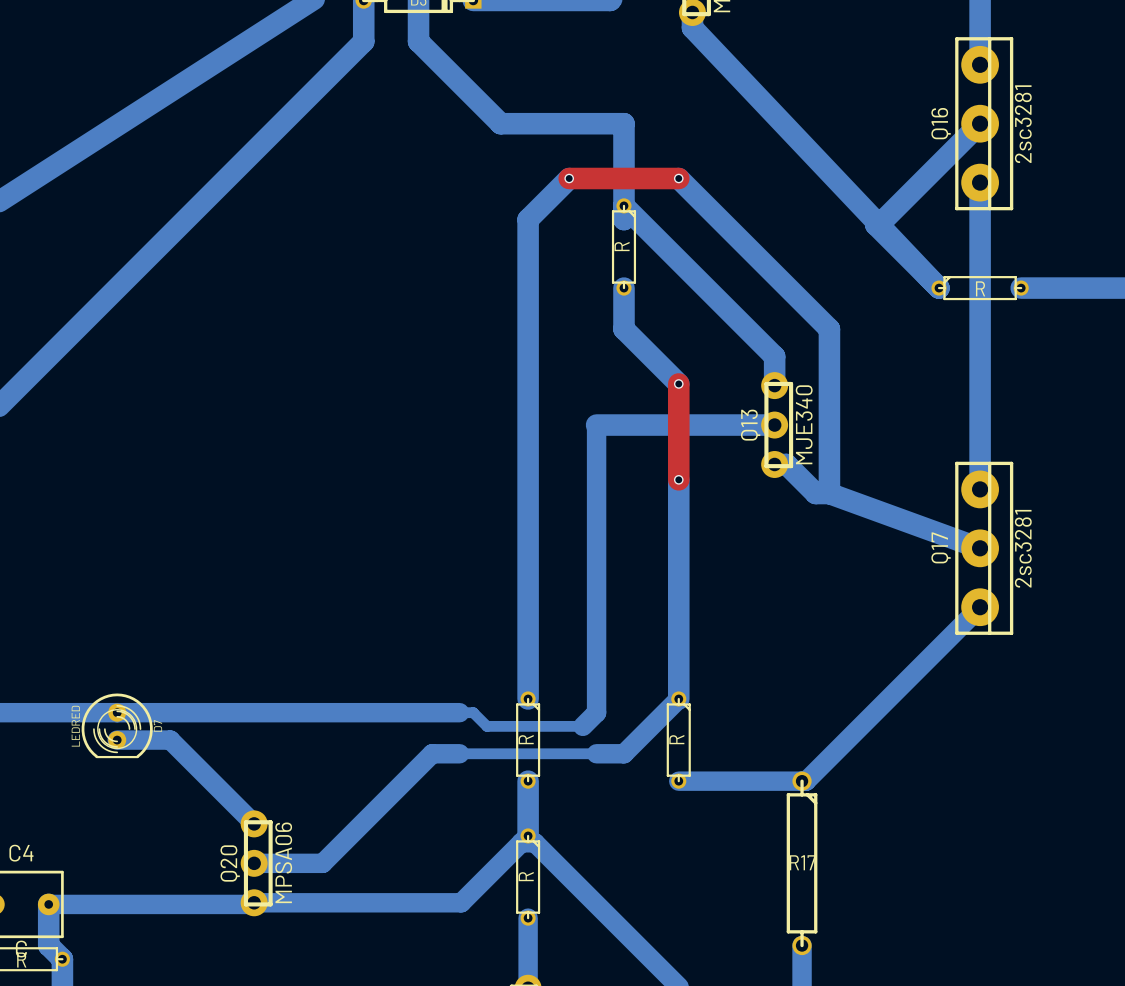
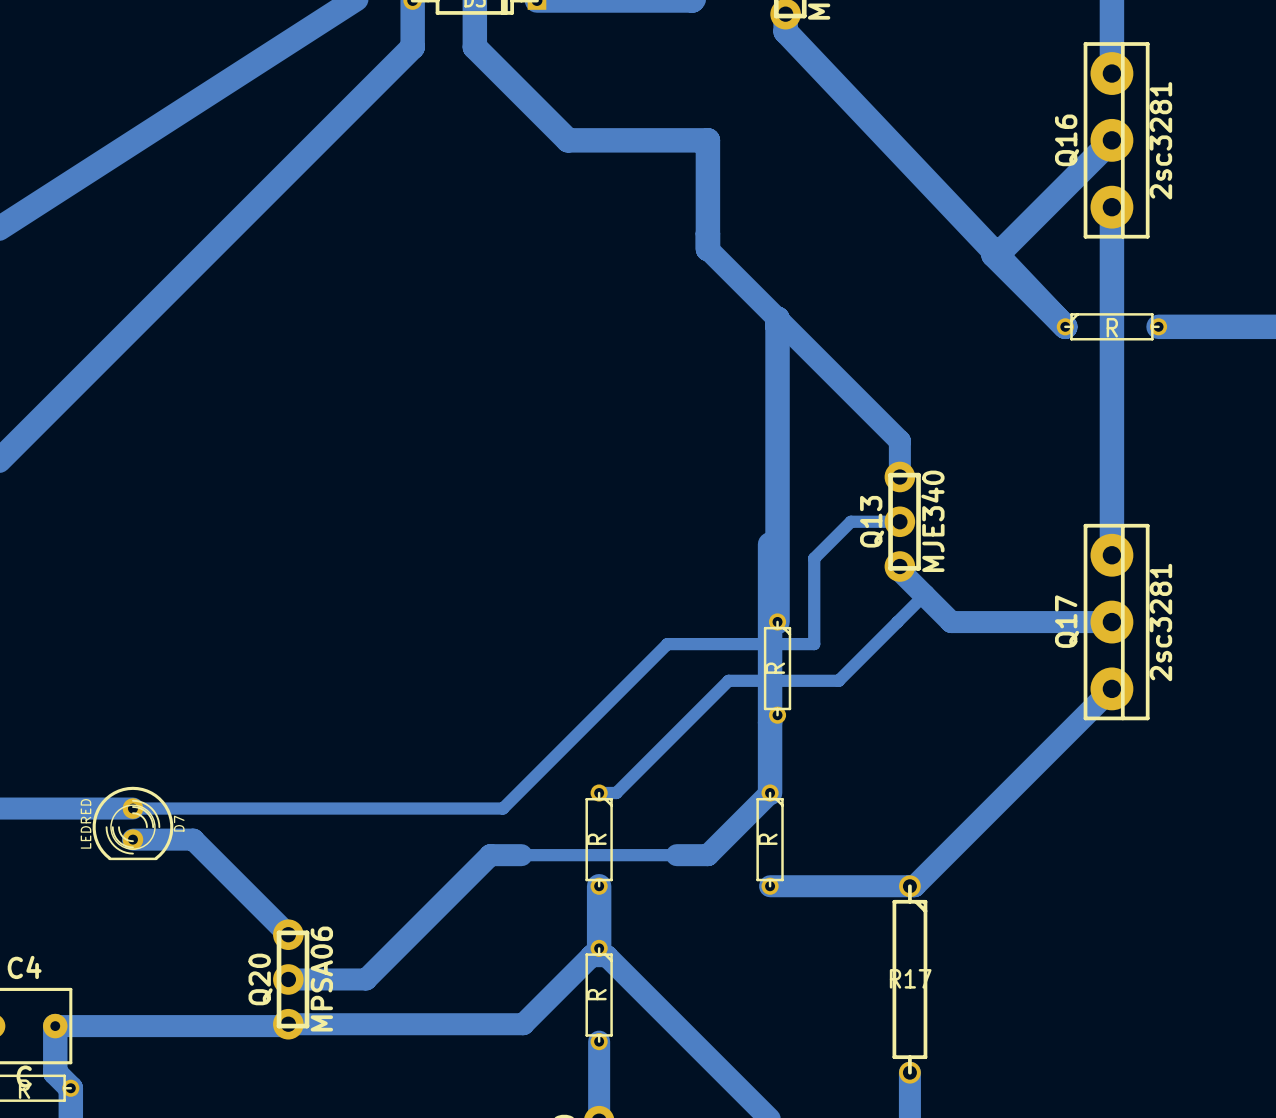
bottom track: (569, 178) (528, 219) (528, 698) -> (924, 595) (838, 680) (728, 680) (616, 793) (599, 793)
top track: (569, 178) (678, 178) -> none
via: (569, 178) -> none
bottom track: (678, 178) (829, 329) (829, 493) -> none
via: (678, 178) -> none
bottom track: (623, 205) (774, 356) (774, 385) -> none
bottom track: none -> (707, 249) (899, 441) (899, 476)
part: R (623, 246) -> none
bottom track: none -> (777, 318) (777, 621)
bottom track: (623, 288) (623, 329) (678, 383) -> none
top track: (678, 383) (678, 479) -> none
via: (678, 383) -> none
bottom track: (774, 425) (596, 425) (596, 712) (582, 726) (487, 726) (473, 712) (443, 712) -> (899, 521) (850, 521) (814, 558) (814, 644) (667, 644) (502, 808)
Q13 position: (777, 425) -> (902, 521)
bottom track: (774, 464) (786, 464) (815, 493) (829, 493) -> none
via: (678, 479) -> none
bottom track: (829, 493) (980, 548) -> (899, 566) (899, 570) (951, 622) (1111, 622)
part: none -> R (777, 668)
bottom track width: thick (117, 712) (443, 712) -> thin (132, 808) (502, 808)

